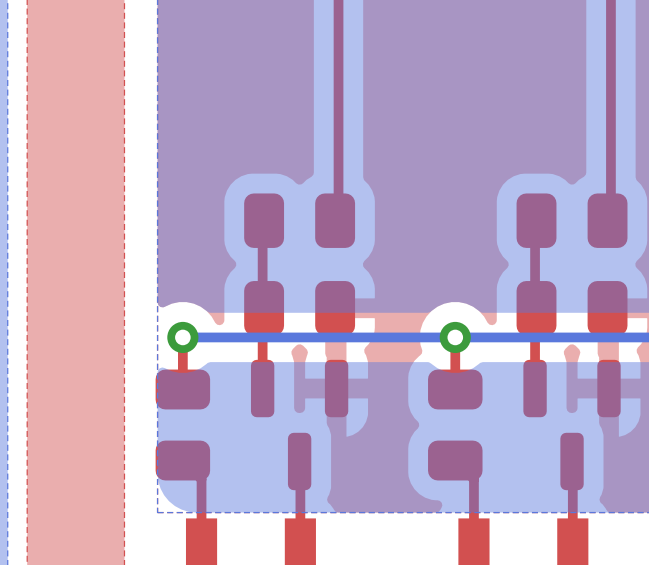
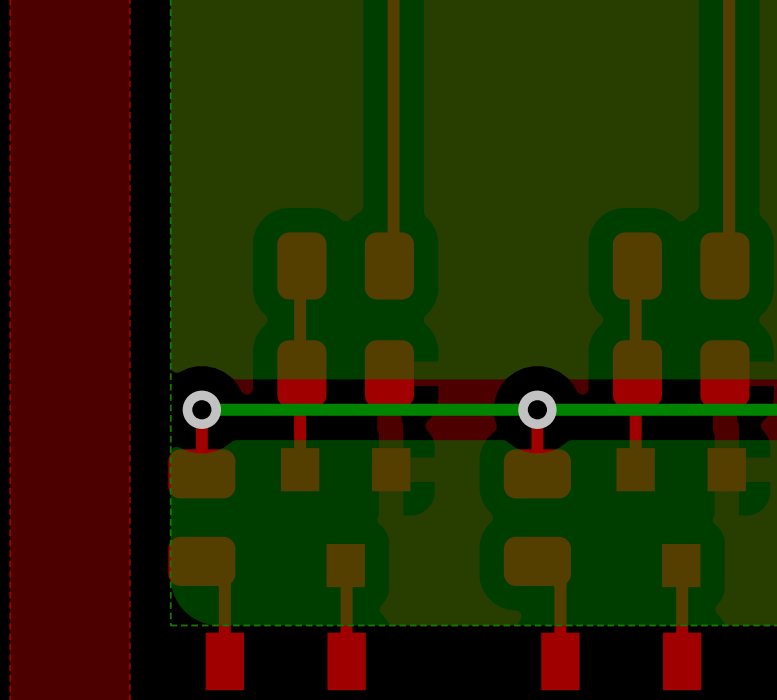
part footprint: [250, 359, 349, 491] -> [280, 448, 411, 588]
part footprint: [523, 359, 621, 491] -> [616, 448, 746, 588]

